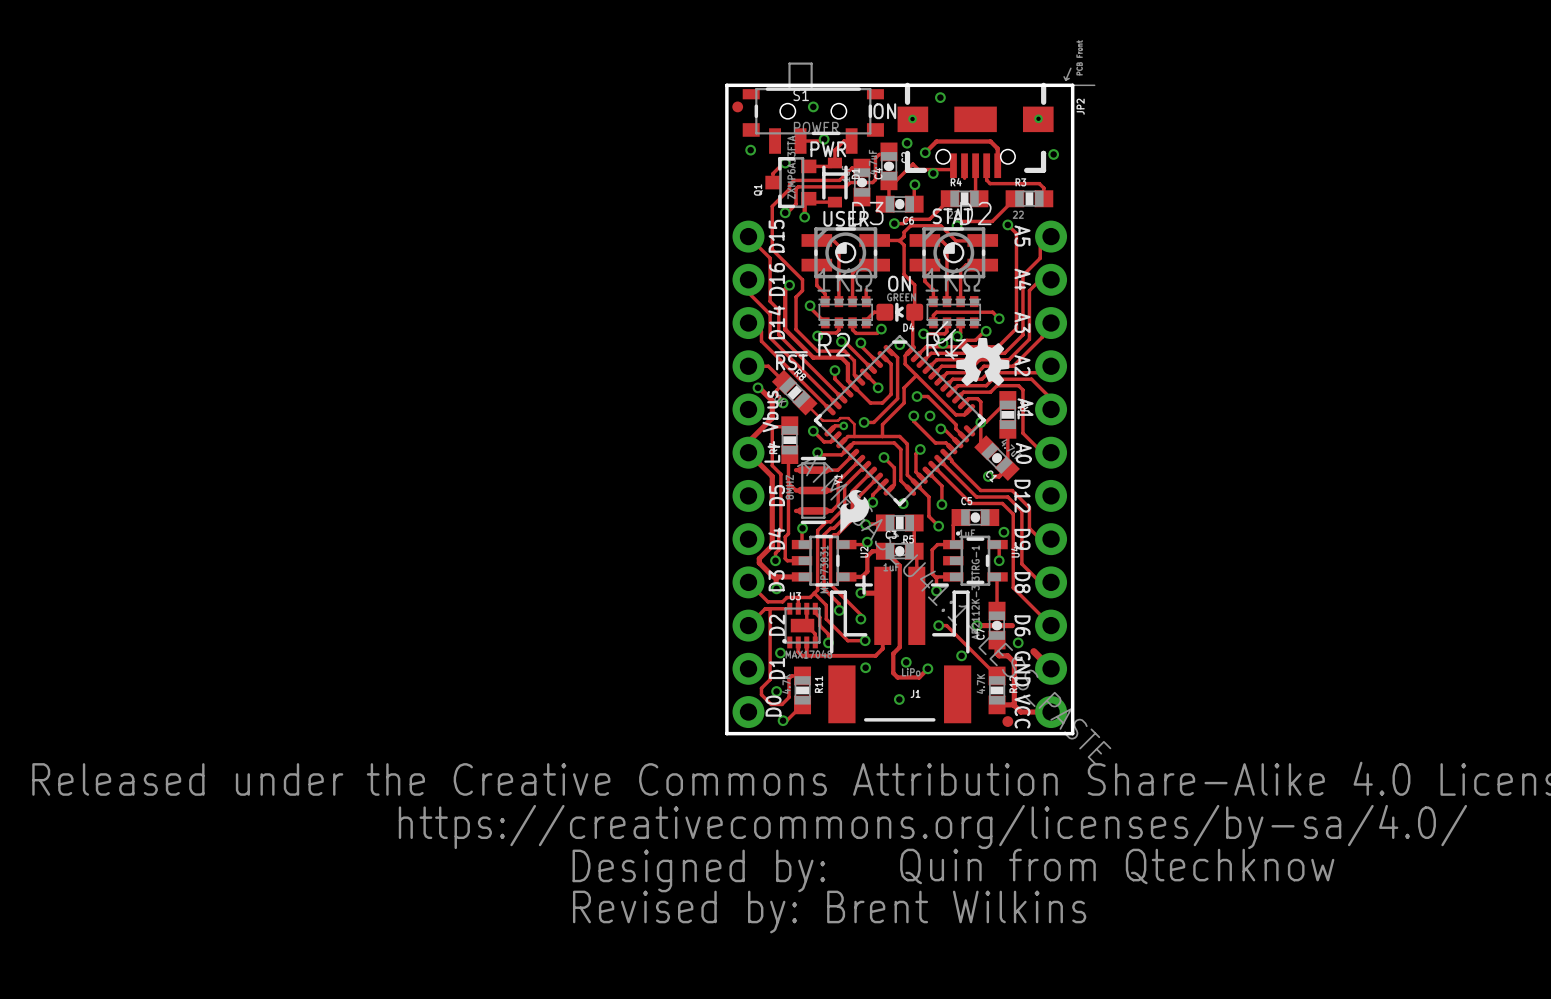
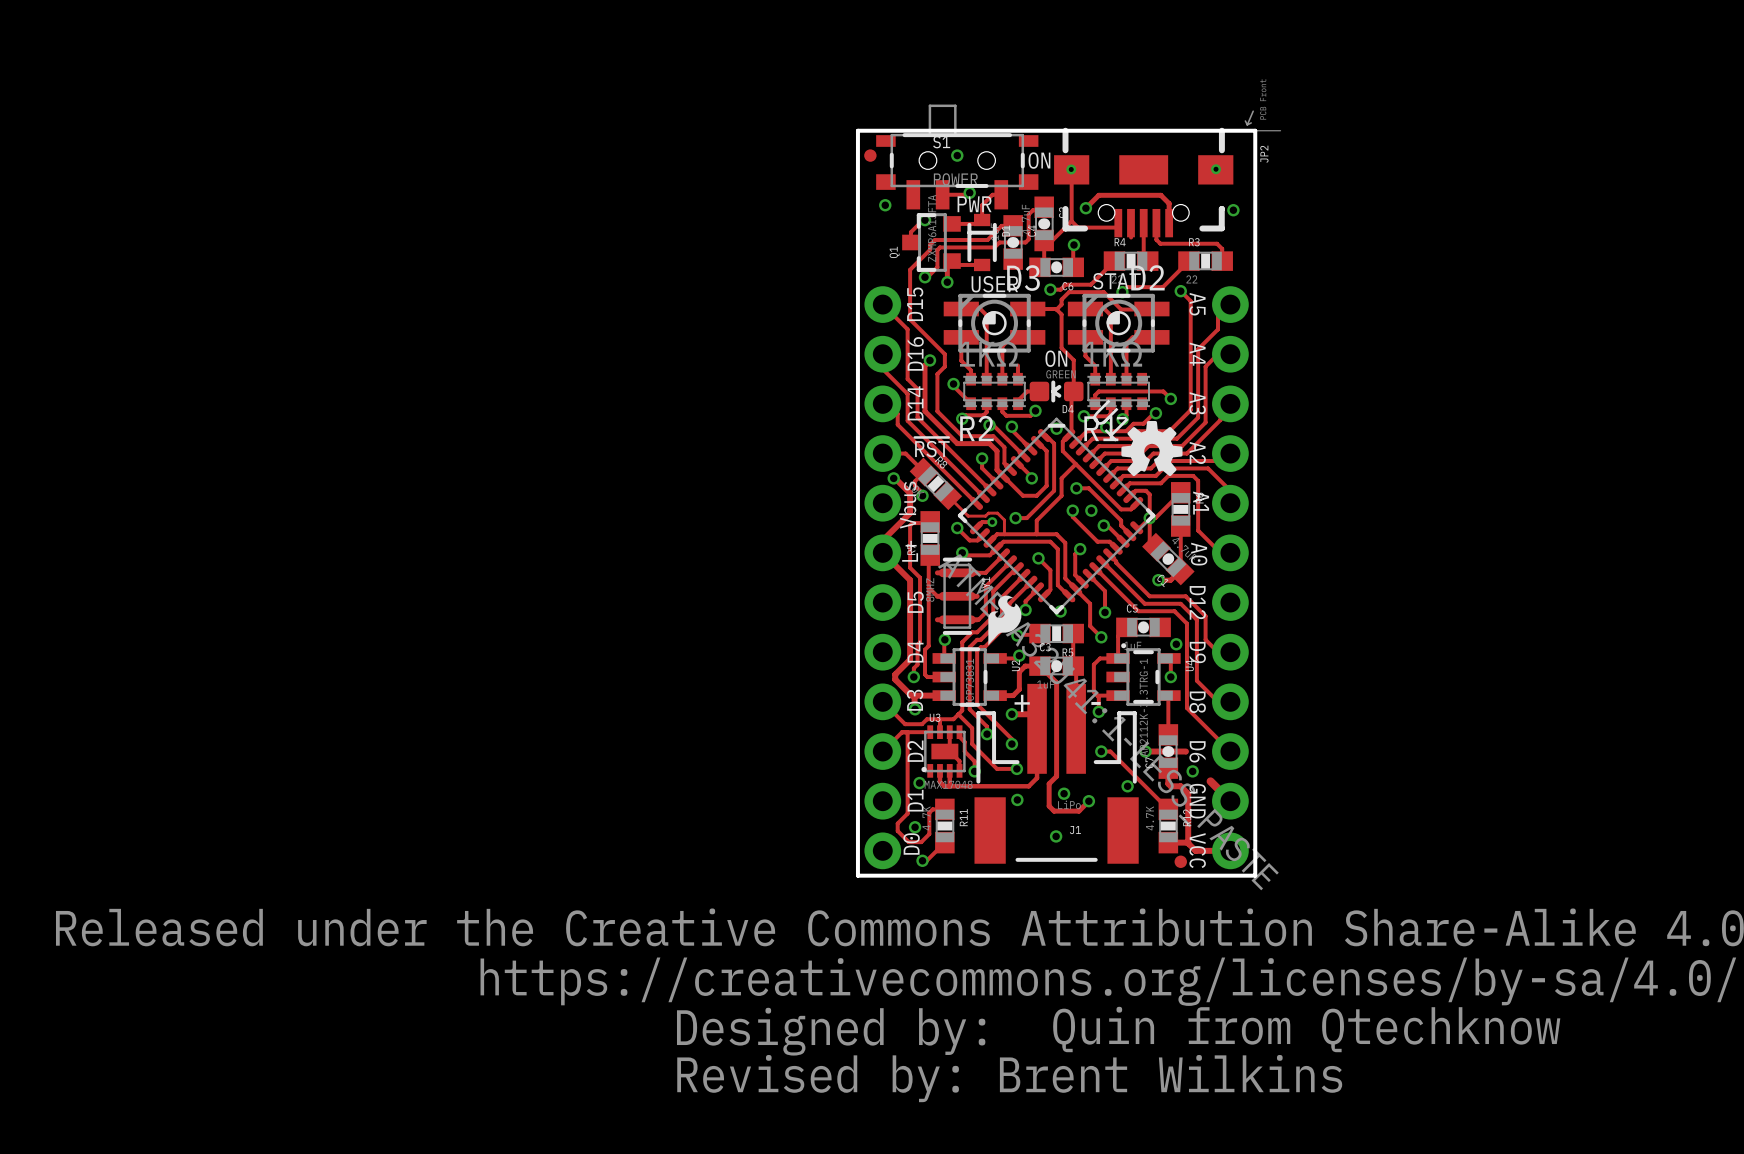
via: (940, 97) -> none
track: none -> (1071, 169) (1071, 221)
via: (907, 143) -> none
via: (933, 173) -> none

